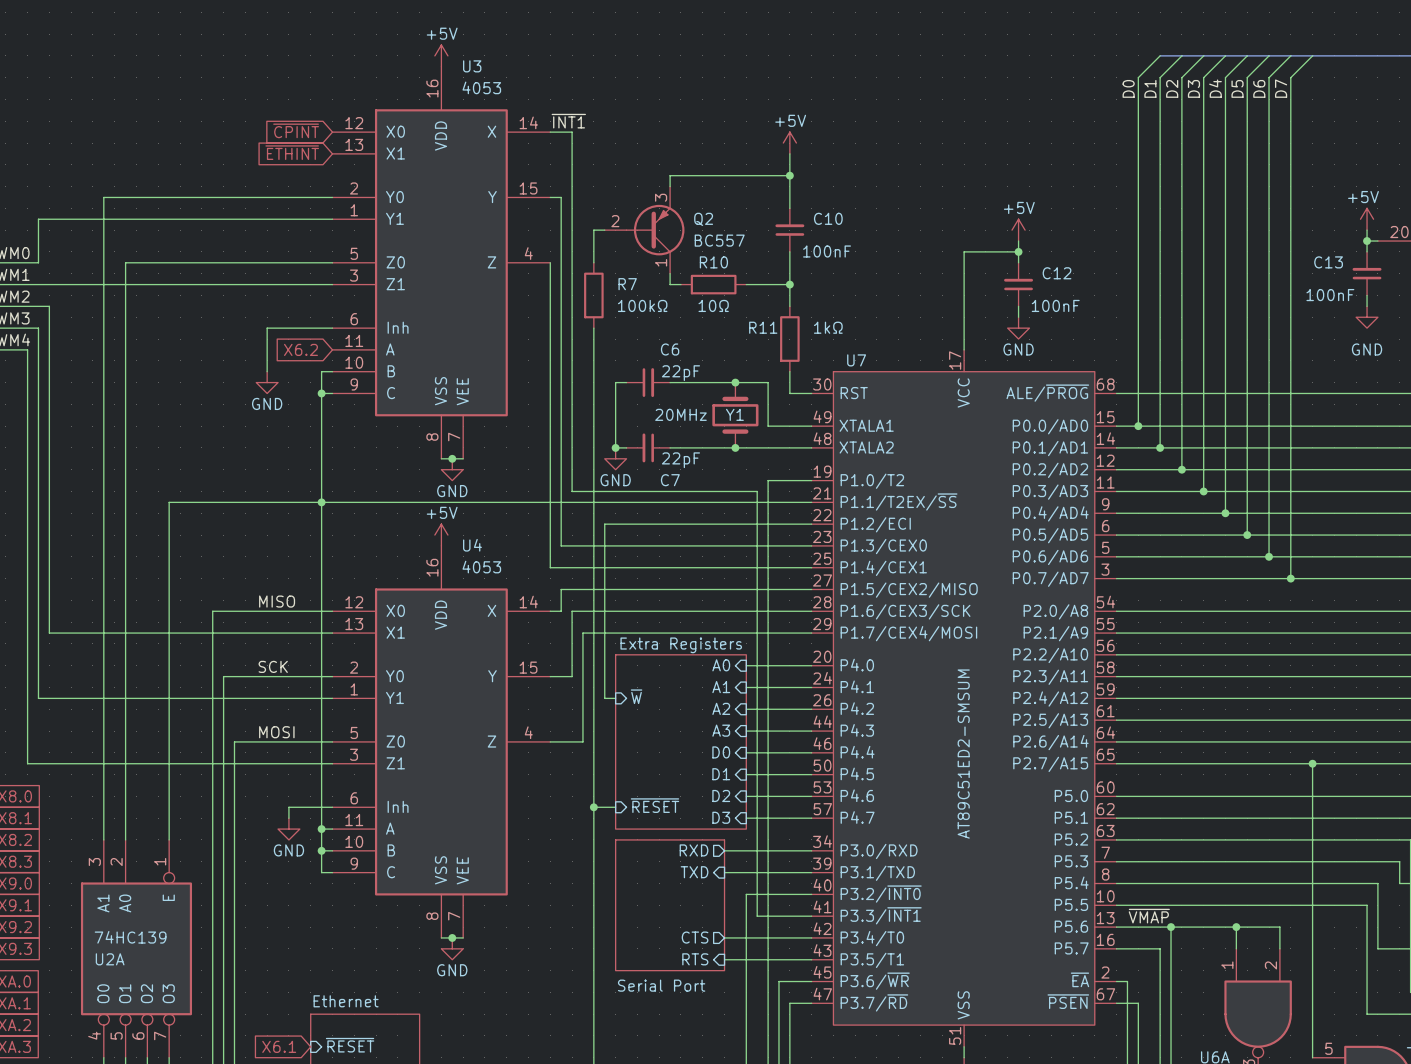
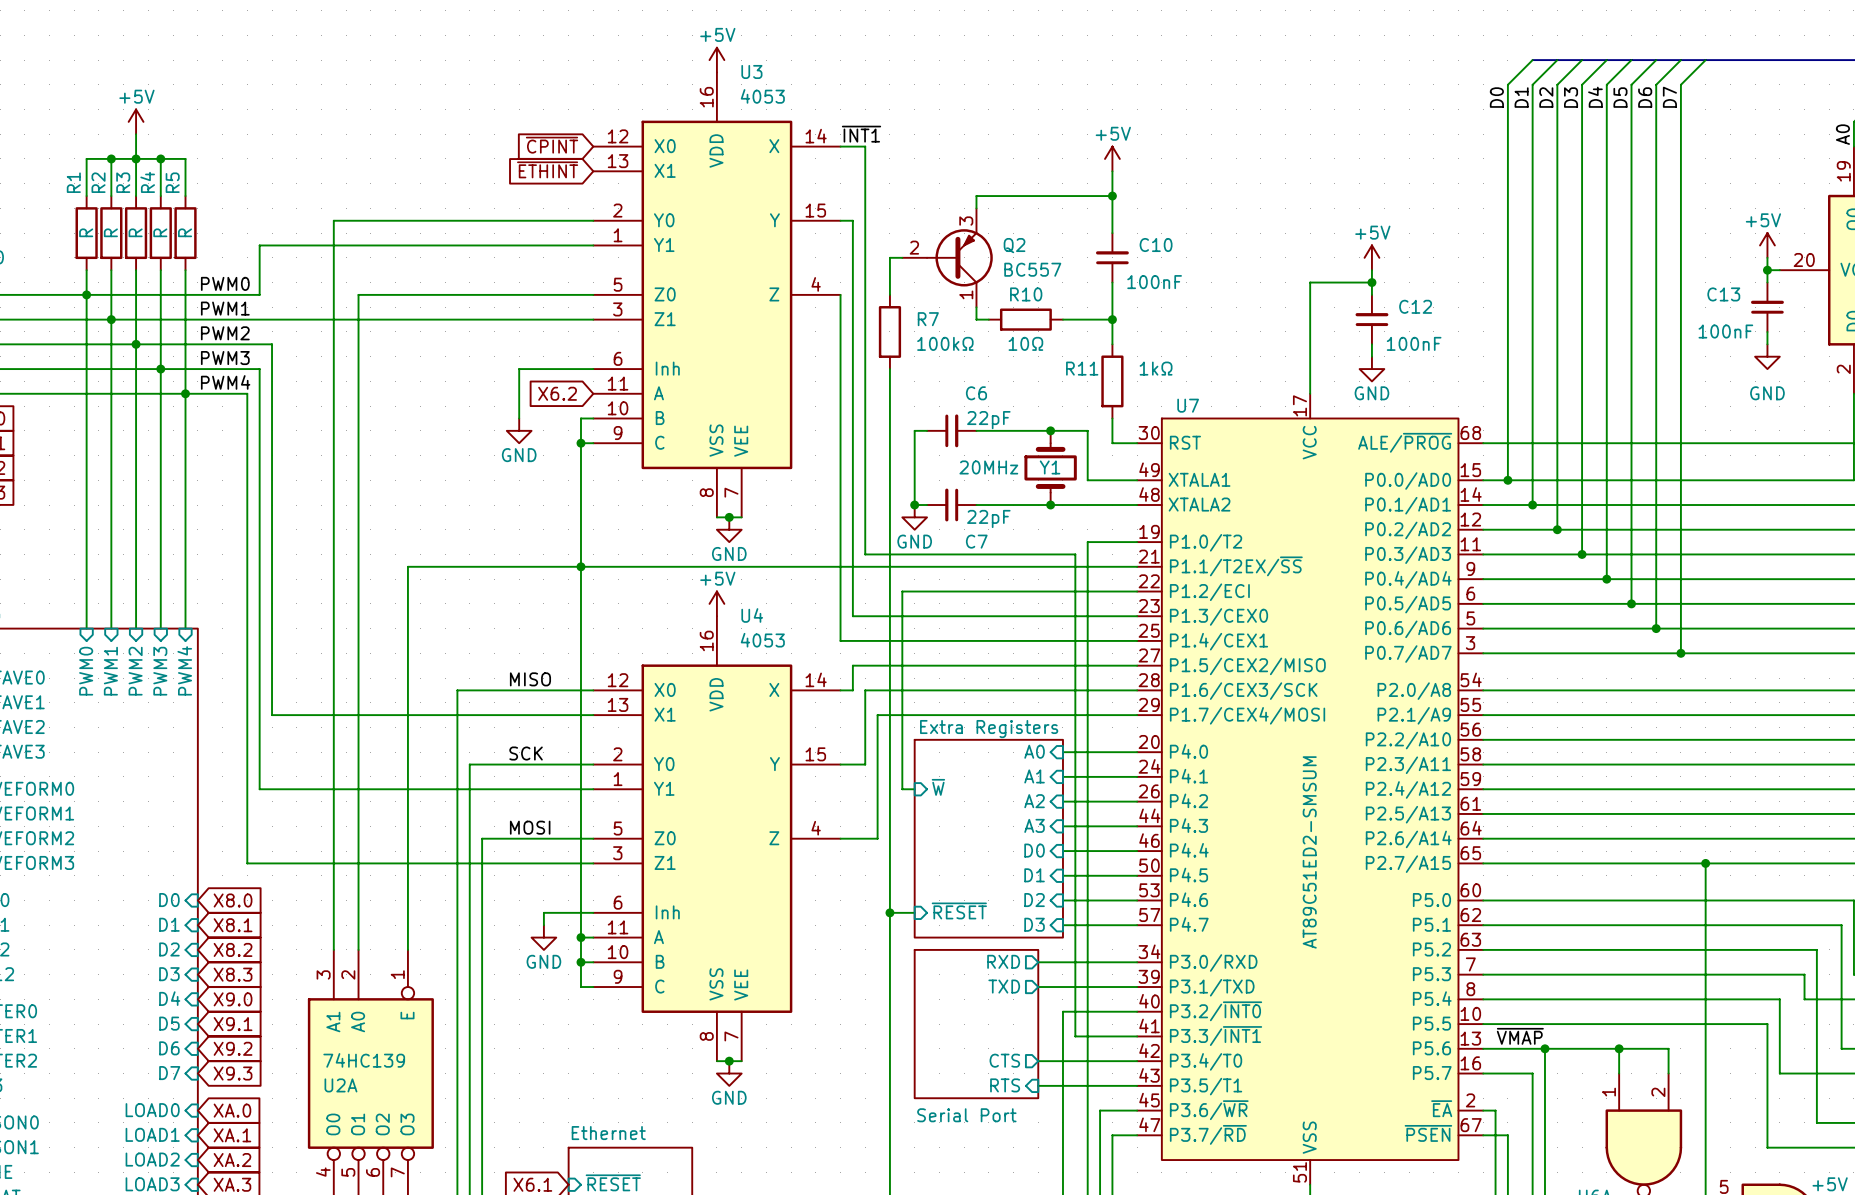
sheet pin shape: input (694, 872) -> output (1004, 986)

